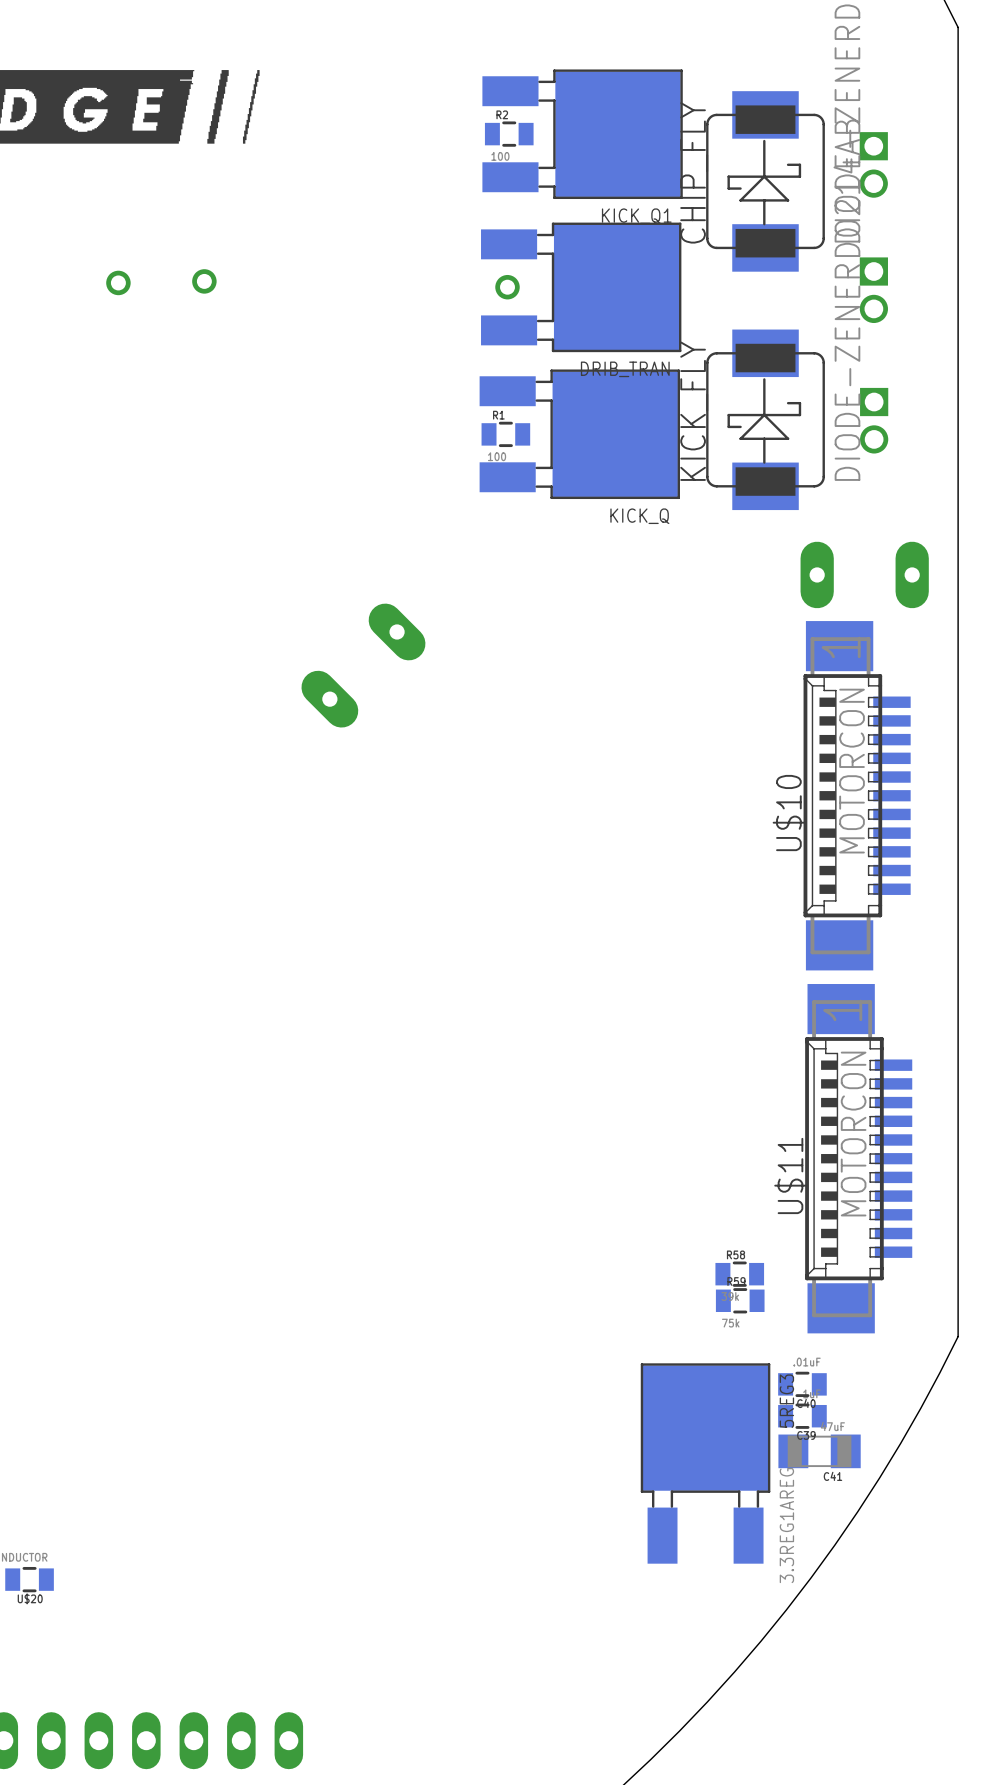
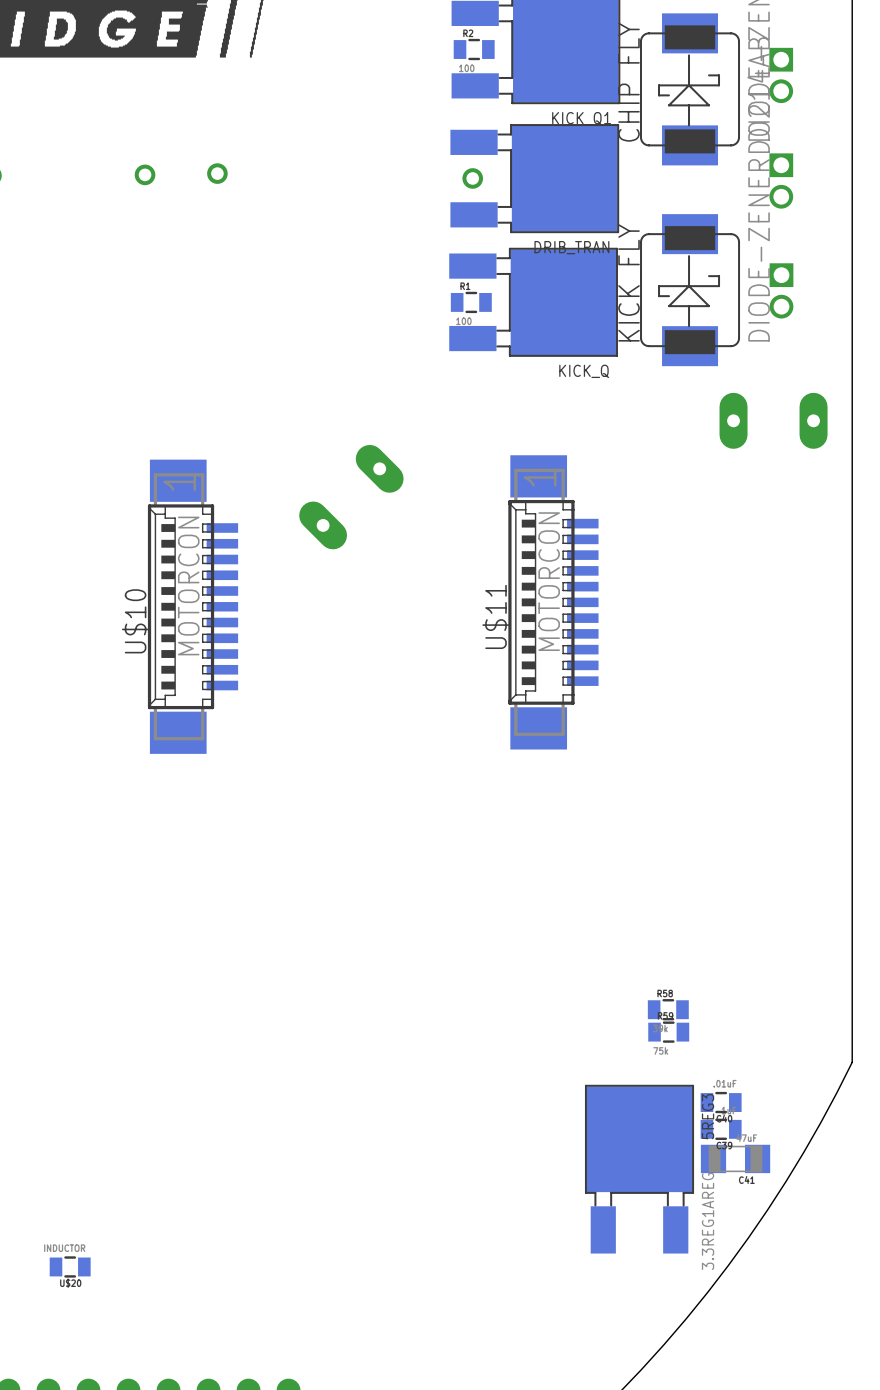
U$10 position: (857, 795) -> (193, 606)
U$11 position: (858, 1158) -> (553, 602)

